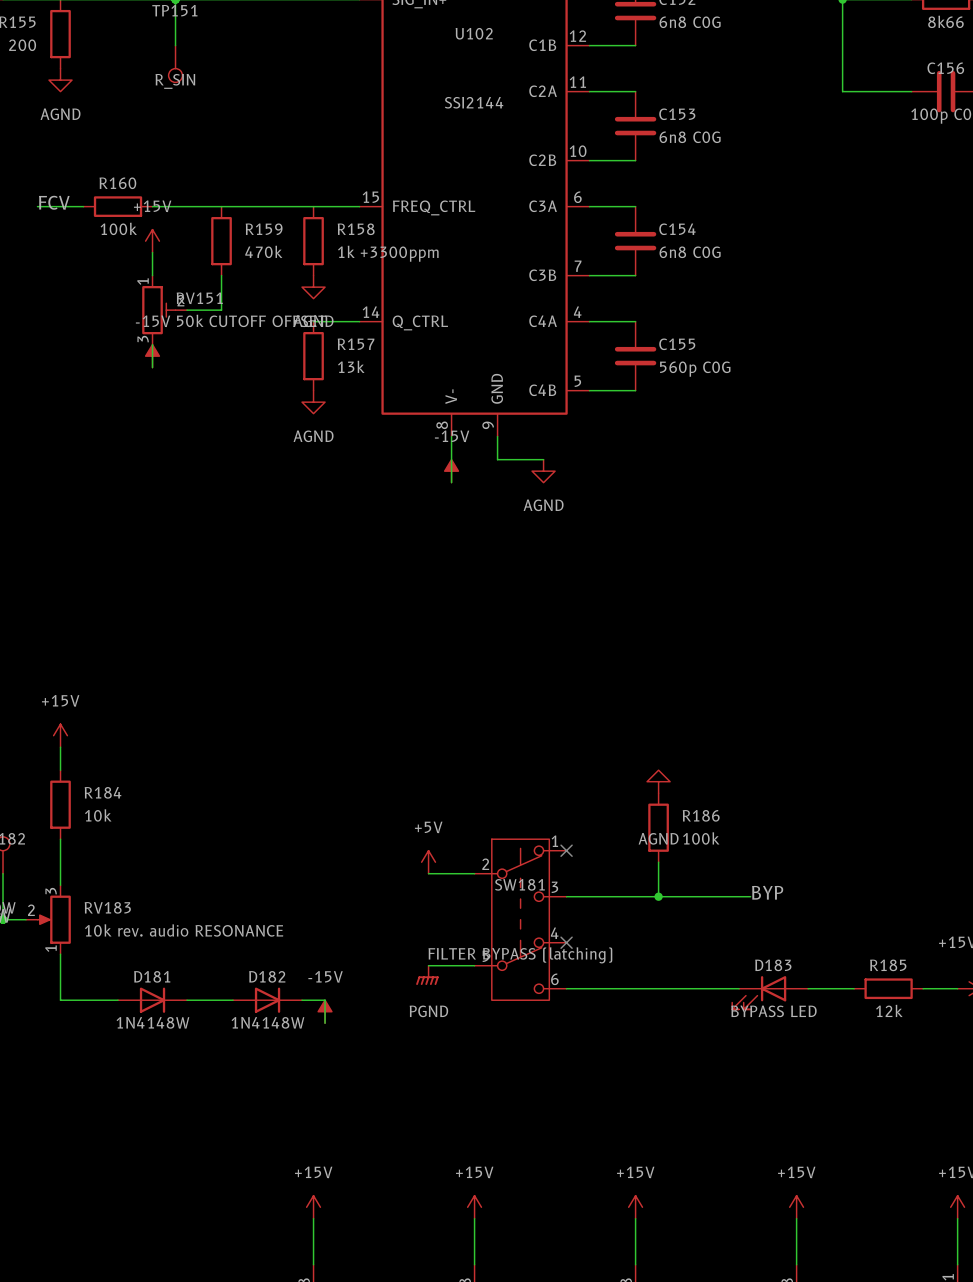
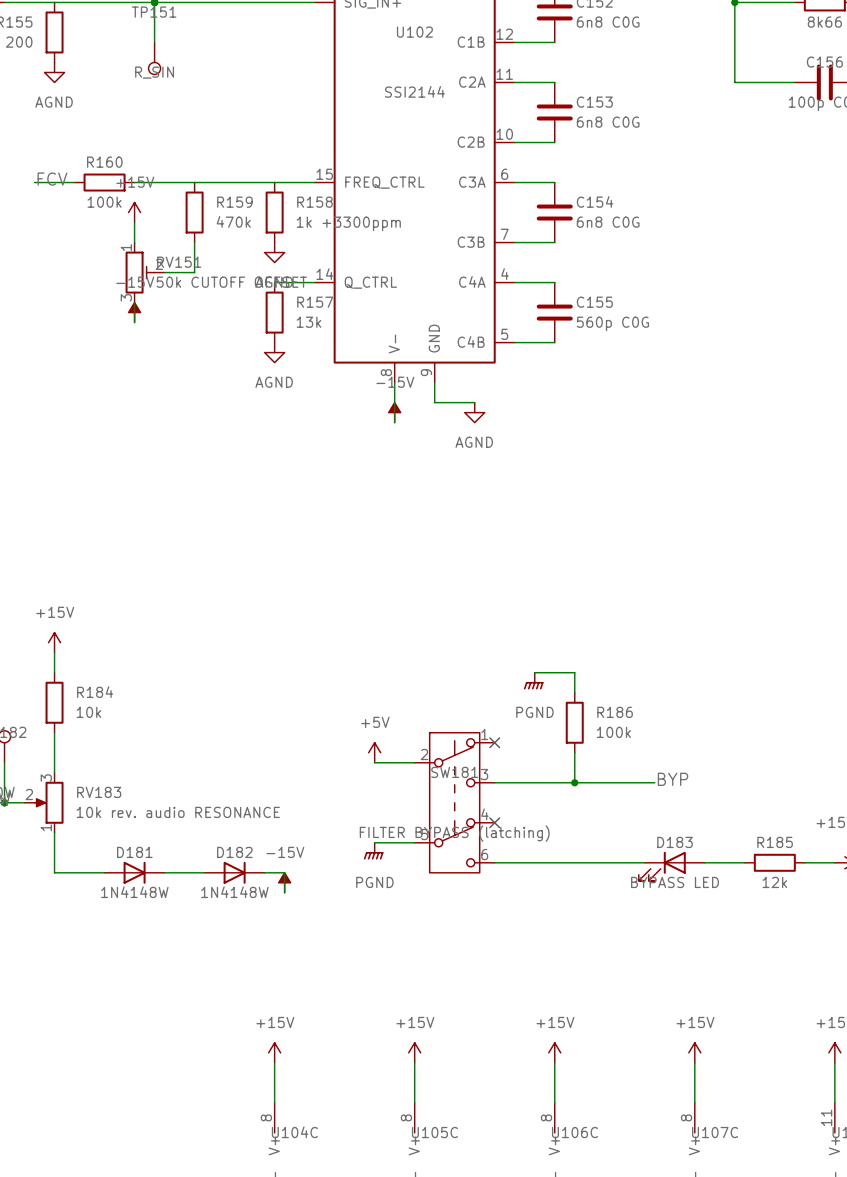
wire: none -> (534, 672) (574, 672) (574, 692)
power symbol: none -> PGND (533, 681)
power symbol: AGND (658, 781) -> none

